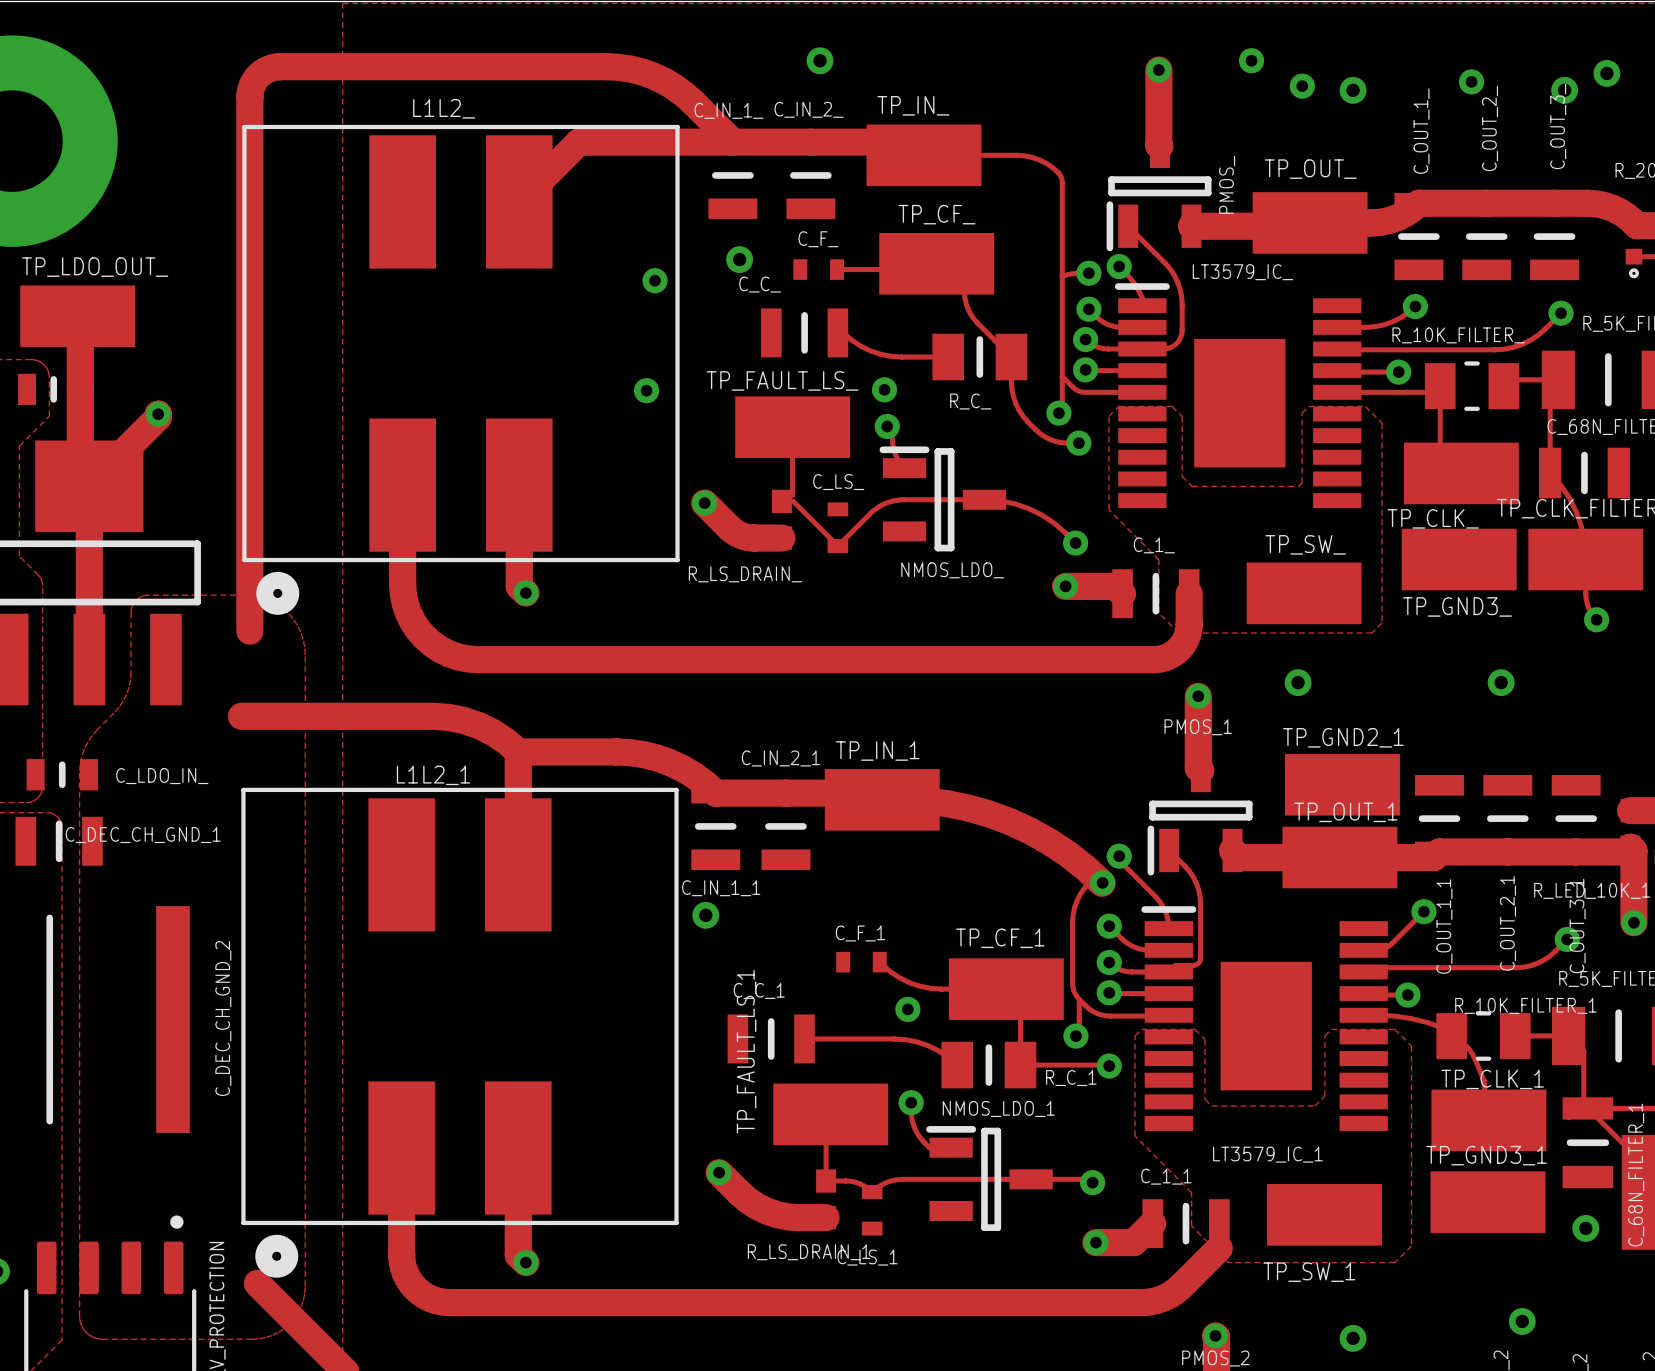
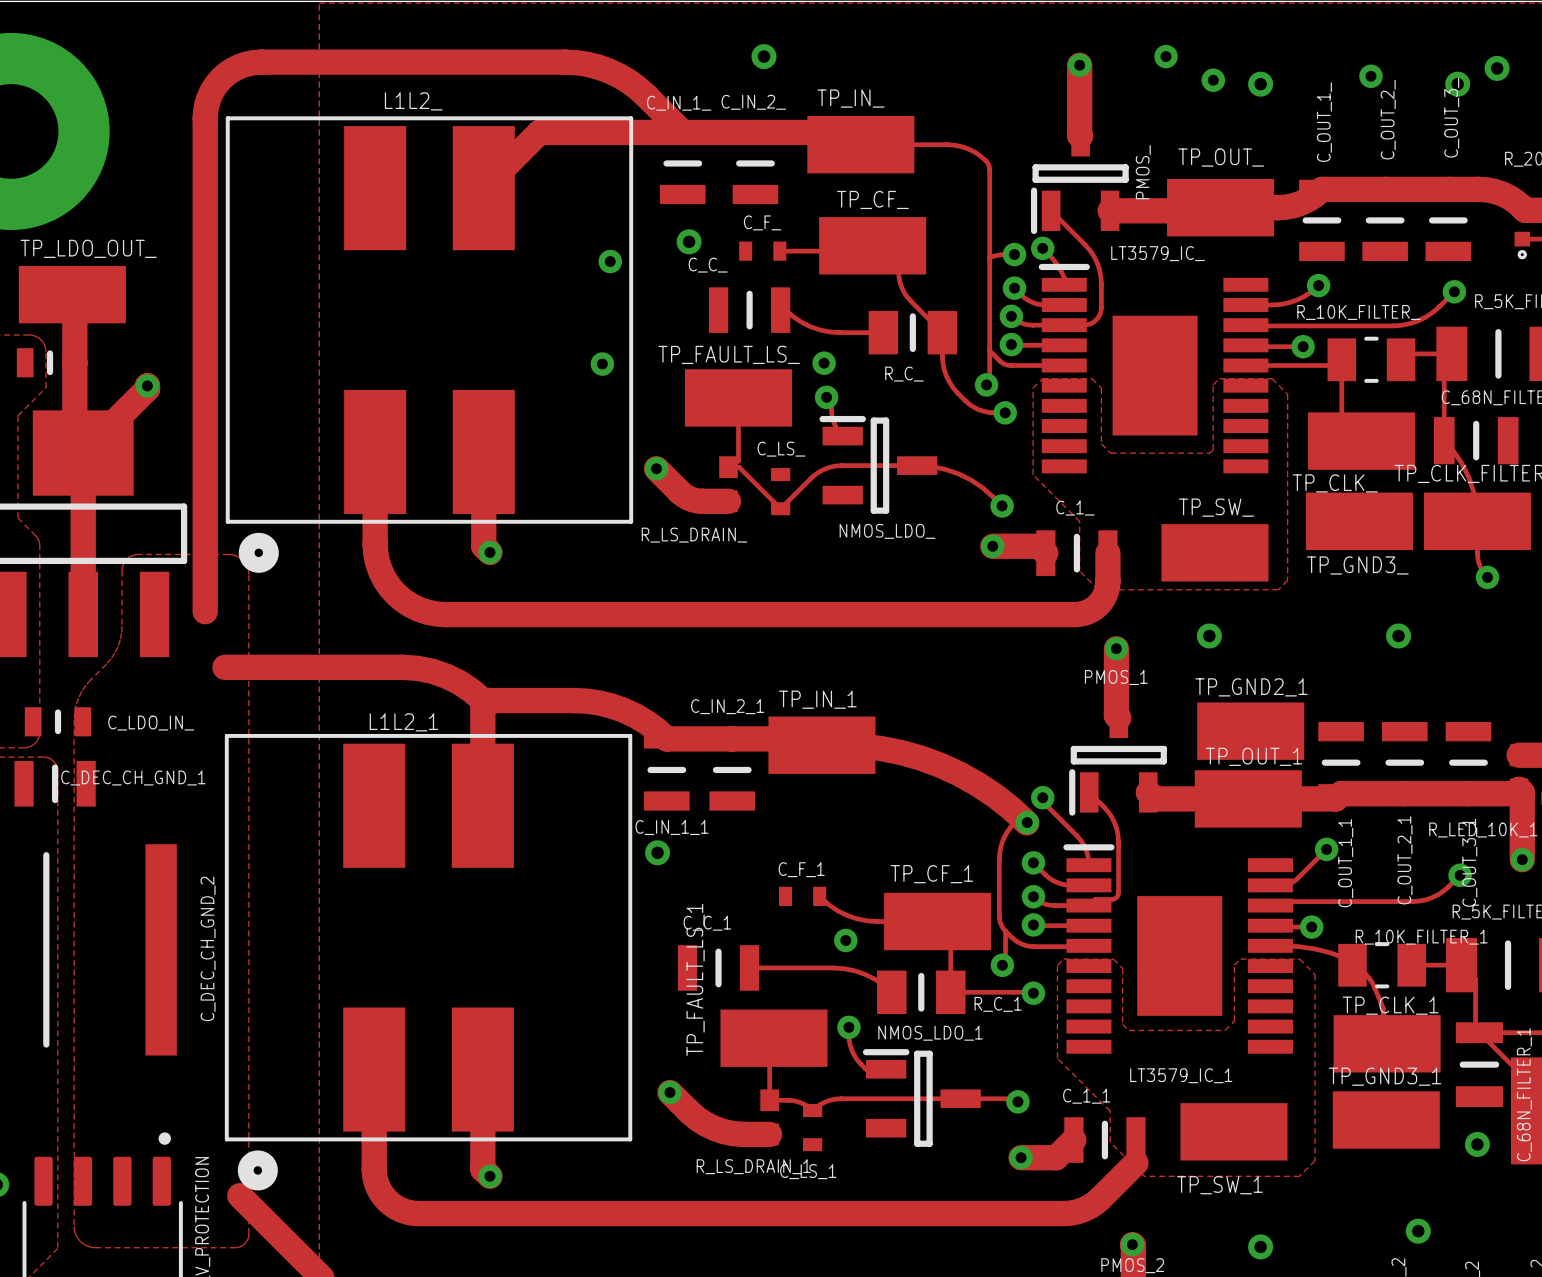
track: (280, 66) (268, 69) (258, 75) (252, 85) (249, 97) (249, 631) -> (261, 62) (239, 66) (227, 73) (212, 90) (205, 110) (205, 611)
zone outline: (245, 595) (268, 599) (287, 612) (300, 631) (305, 654) (304, 1293) (298, 1312) (289, 1323) (272, 1335) (252, 1339) -> (228, 554) (236, 556) (242, 560) (247, 566) (248, 574) (248, 1234) (244, 1243) (235, 1247)

